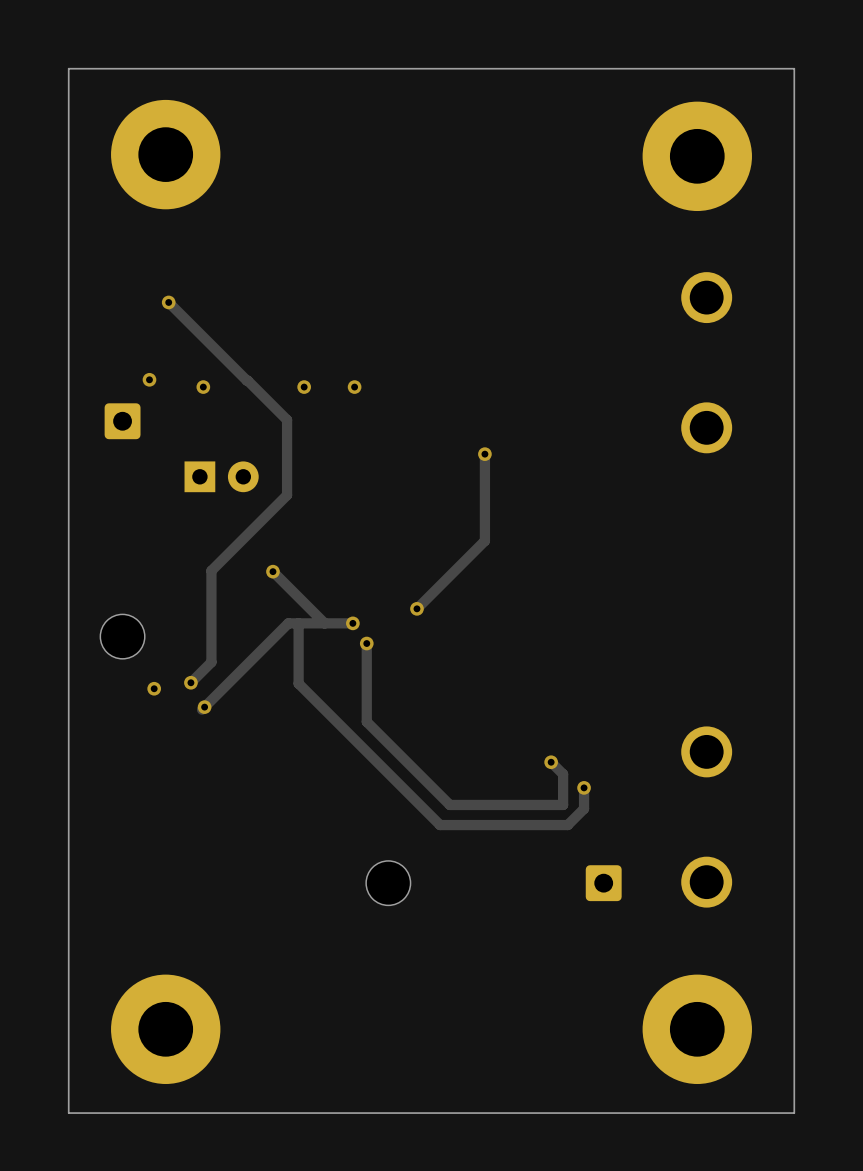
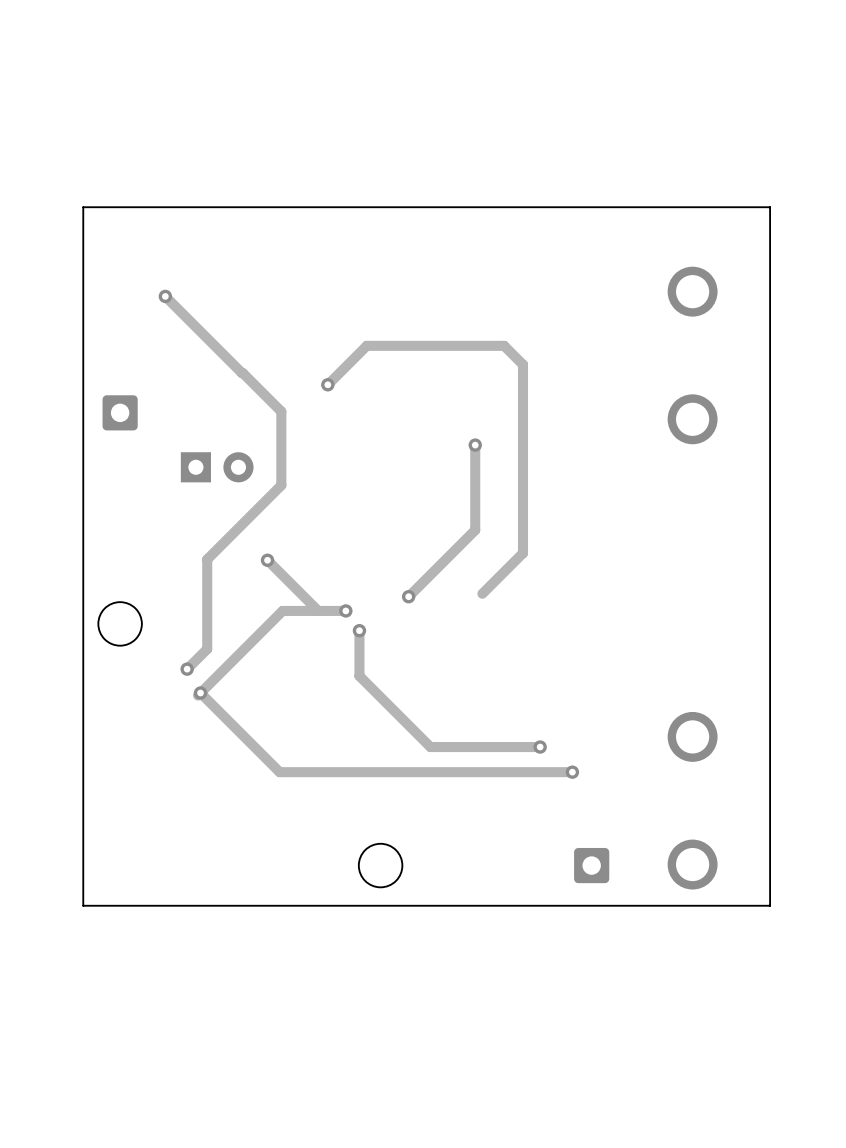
board edge: (794, 68) (68, 68) (68, 1113) (794, 1113) (794, 68) -> (770, 207) (770, 905) (83, 905) (83, 207) (770, 207)
part: (165, 154) -> none
part: (697, 156) -> none
via: (149, 379) -> none
via: (203, 387) -> none
via: (304, 387) -> none
via: (354, 387) -> none
track: none -> (327, 384) (366, 345) (504, 345) (522, 364) (522, 553) (482, 593)
via: none -> (327, 384)
track: (298, 623) (298, 683) (440, 825) (567, 825) (584, 808) (584, 787) -> (200, 693) (279, 772) (572, 772)
via: (154, 688) -> none
track: (366, 689) (366, 721) (449, 804) (563, 804) (563, 774) (551, 762) -> (359, 676) (430, 747) (540, 747)
part: (165, 1029) -> none
part: (697, 1029) -> none

